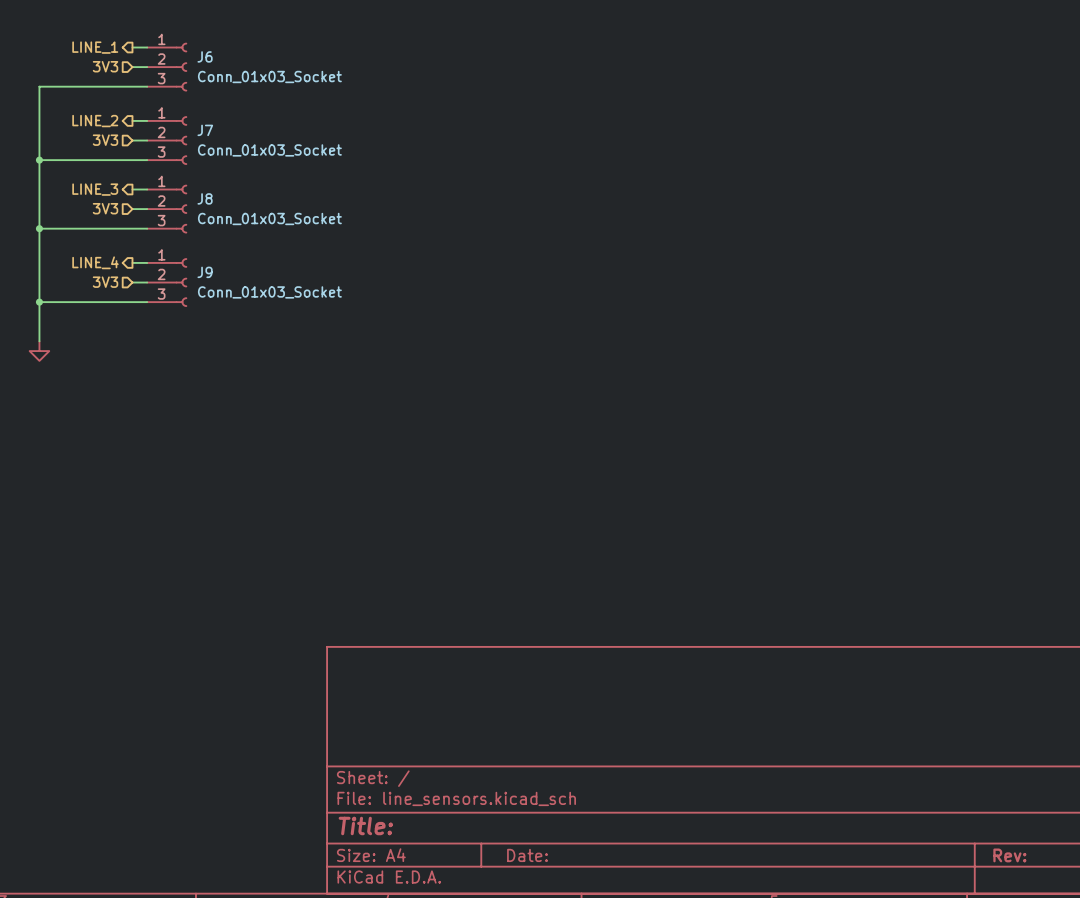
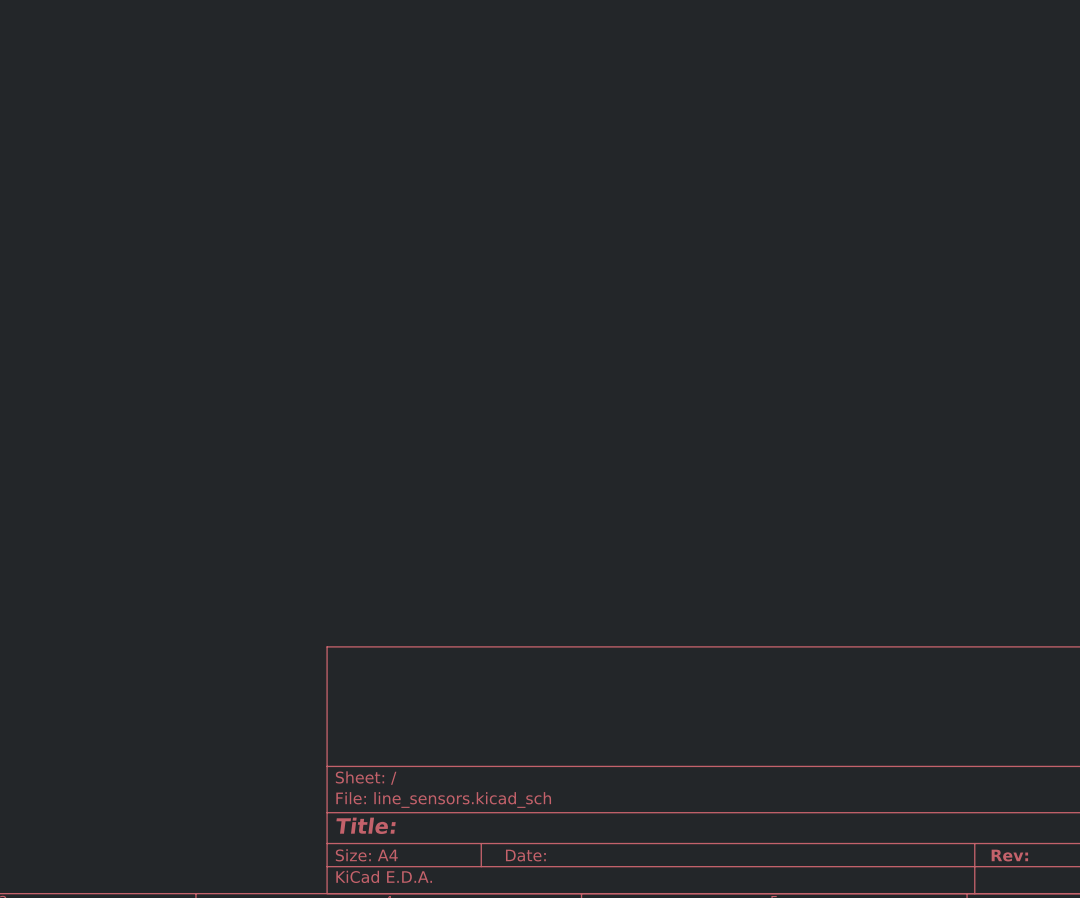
hierarchical label: LINE_1 (95, 47) -> none
wire: (132, 47) (147, 47) -> none
hierarchical label: 3V3 (105, 66) -> none
wire: (132, 67) (147, 67) -> none
J6: Conn_01x03_Socket (167, 67) -> none
wire: (147, 86) (39, 86) (39, 341) -> none
wire: (132, 120) (147, 120) -> none
hierarchical label: LINE_2 (95, 121) -> none
hierarchical label: 3V3 (105, 140) -> none
wire: (132, 140) (147, 140) -> none
J7: Conn_01x03_Socket (167, 140) -> none
wire: (39, 160) (147, 160) -> none
junction: (39, 160) -> none
hierarchical label: LINE_3 (95, 189) -> none
wire: (132, 189) (147, 189) -> none
hierarchical label: 3V3 (105, 208) -> none
wire: (132, 209) (147, 209) -> none
J8: Conn_01x03_Socket (167, 209) -> none
wire: (39, 228) (147, 228) -> none
junction: (39, 228) -> none
hierarchical label: LINE_4 (95, 262) -> none
wire: (132, 262) (147, 262) -> none
hierarchical label: 3V3 (105, 282) -> none
wire: (132, 282) (147, 282) -> none
J9: Conn_01x03_Socket (167, 282) -> none
wire: (39, 302) (147, 302) -> none
junction: (39, 302) -> none
power symbol: (39, 351) -> none

